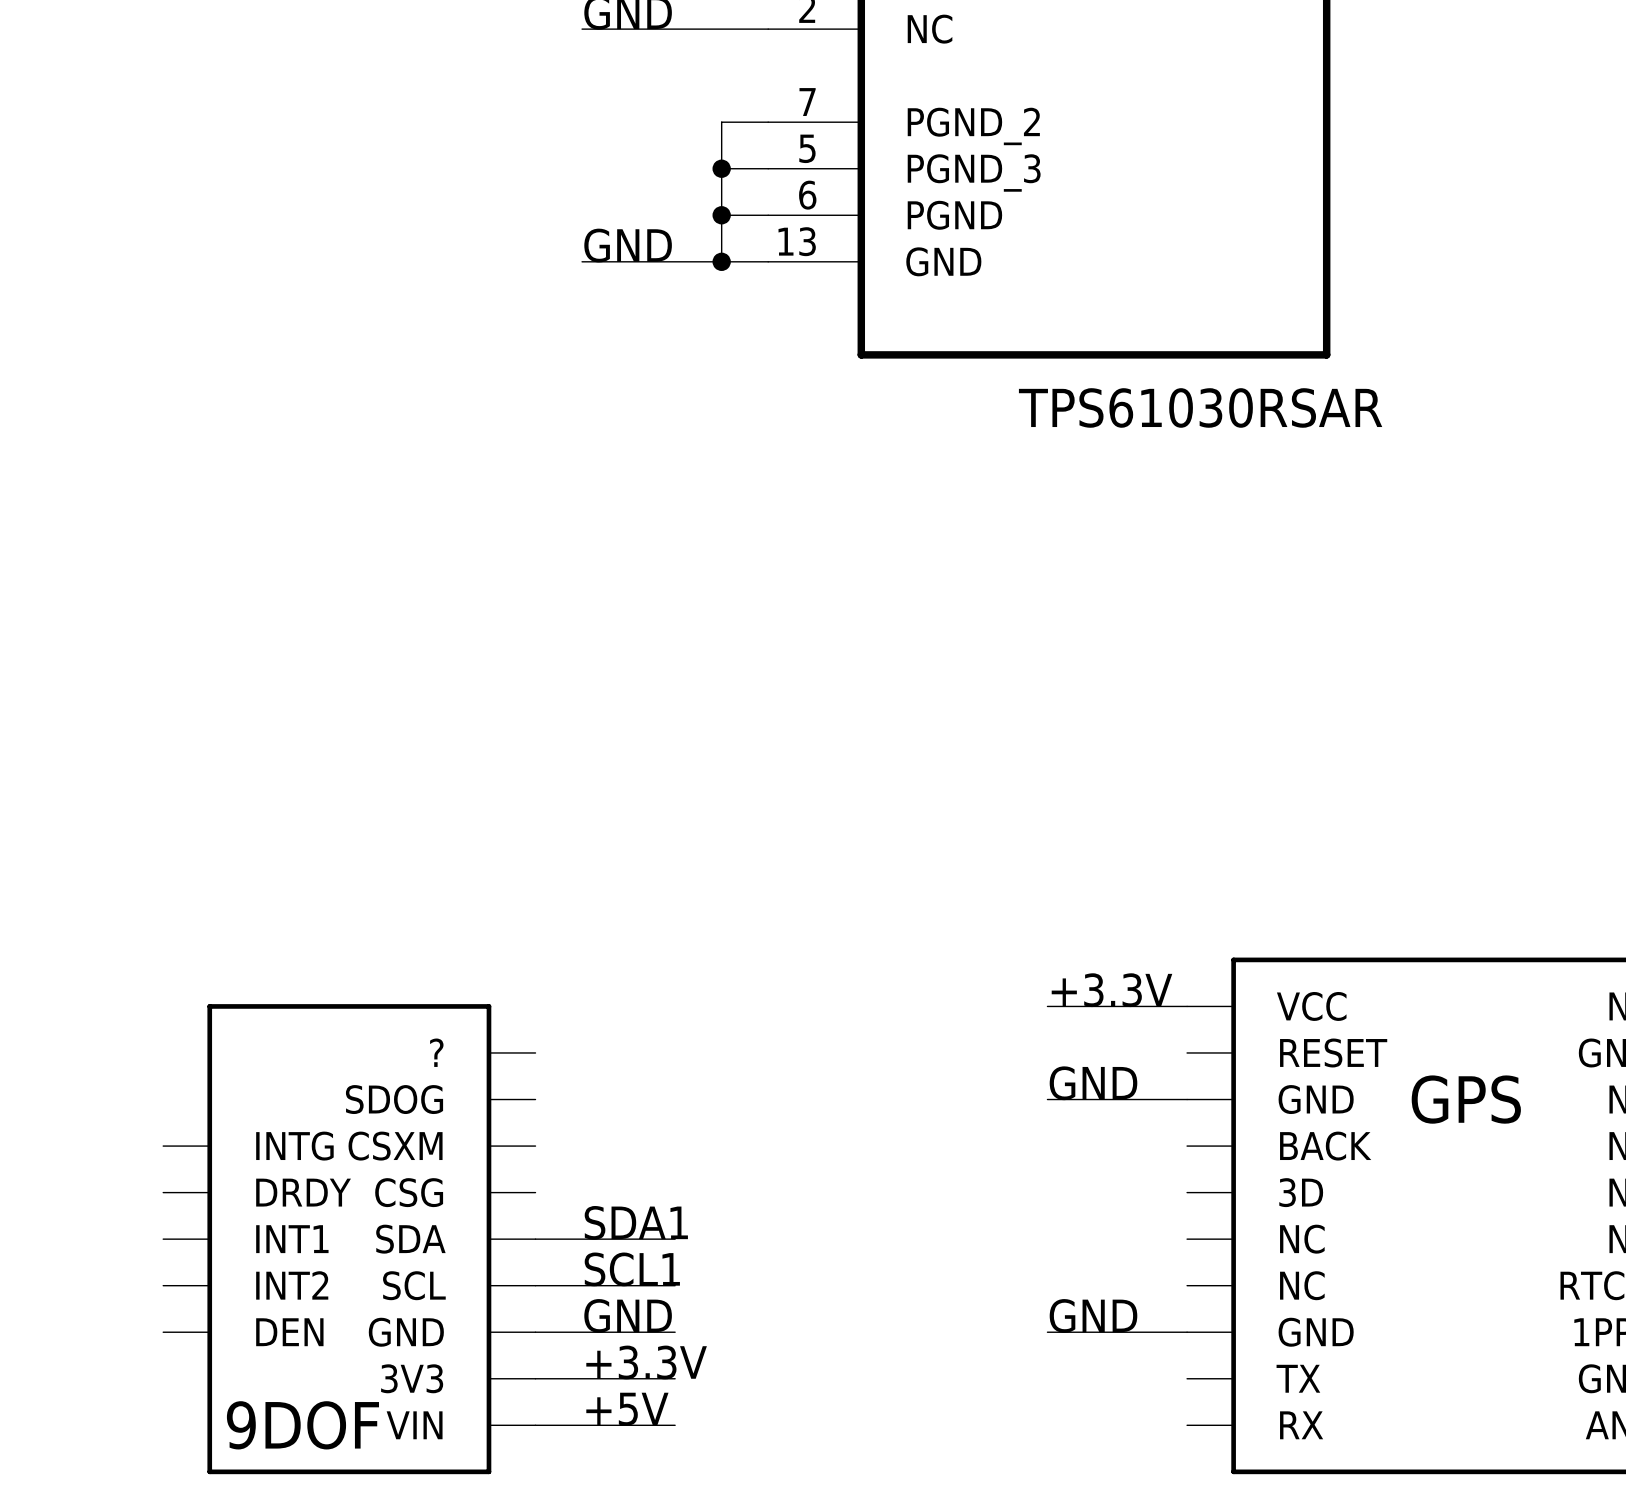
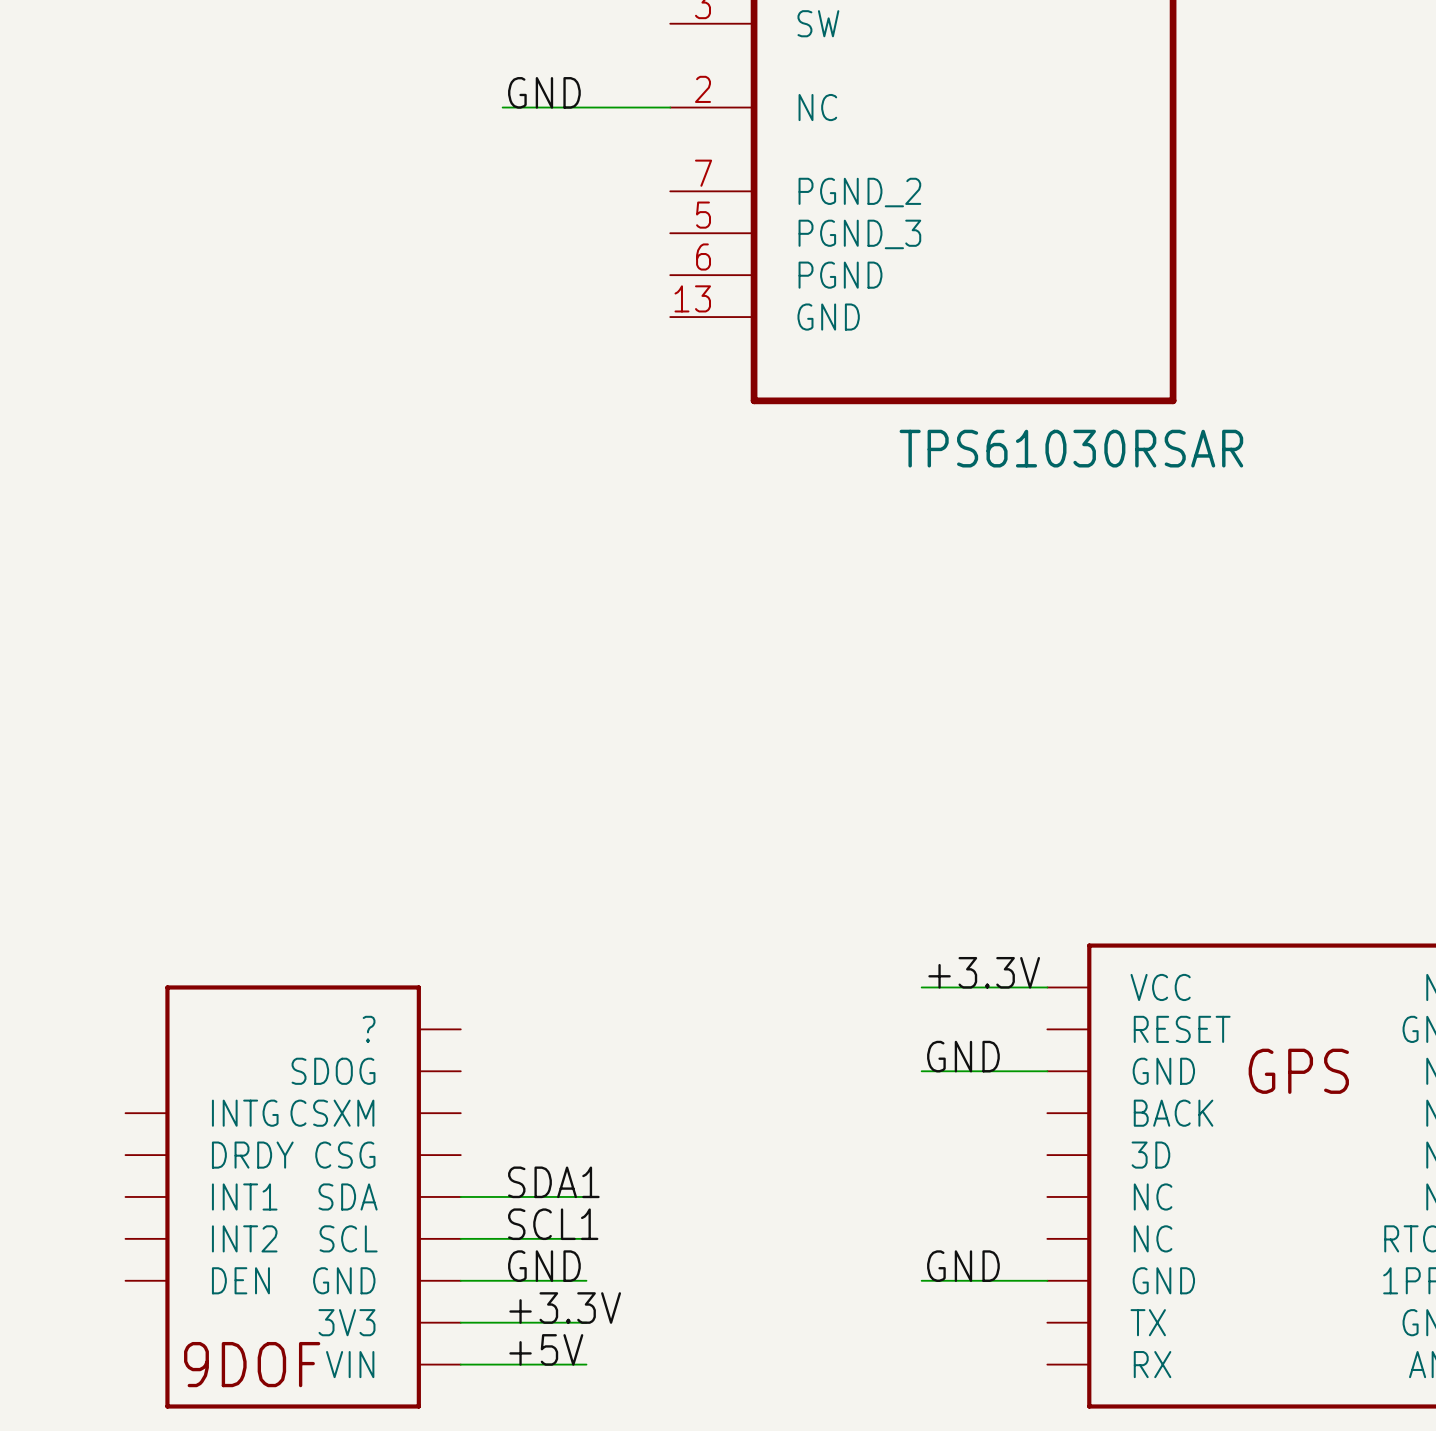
wire: (768, 122) (721, 122) (721, 261) -> none
wire: (721, 168) (768, 168) -> none
junction: (721, 168) -> none
wire: (721, 215) (768, 215) -> none
junction: (721, 215) -> none
label: GND (628, 245) -> none
wire: (582, 261) (768, 261) -> none
junction: (721, 261) -> none

